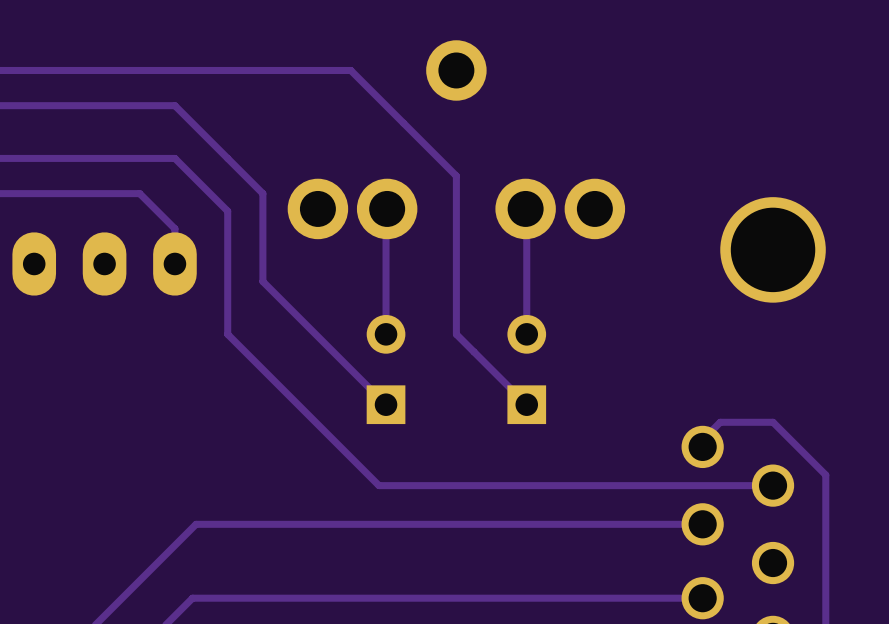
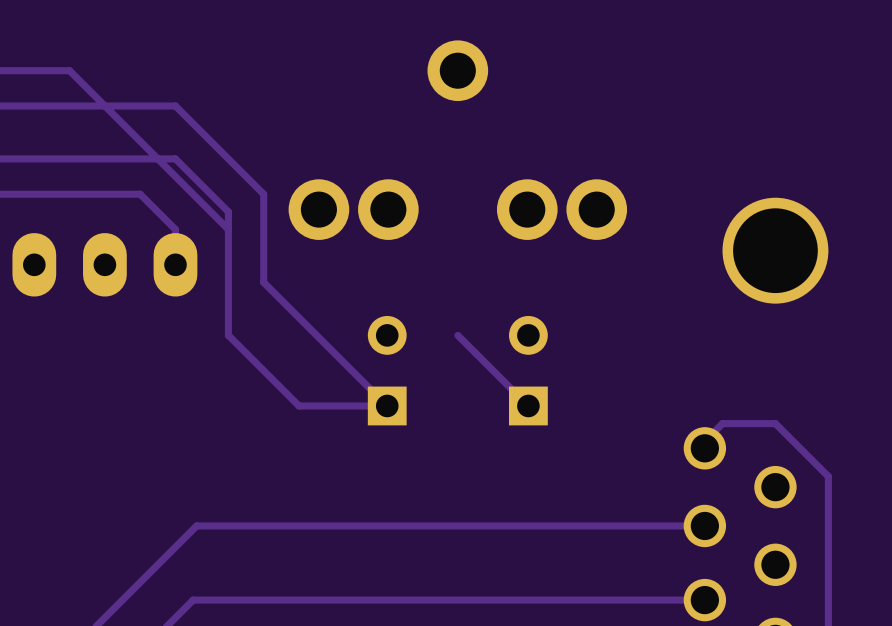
track: (69, 70) (350, 70) (456, 176) (456, 334) -> (69, 70) (228, 229)
track: (387, 208) (386, 334) -> none
track: (525, 208) (526, 334) -> none
track: (298, 404) (378, 485) (773, 485) -> (299, 405) (387, 405)

